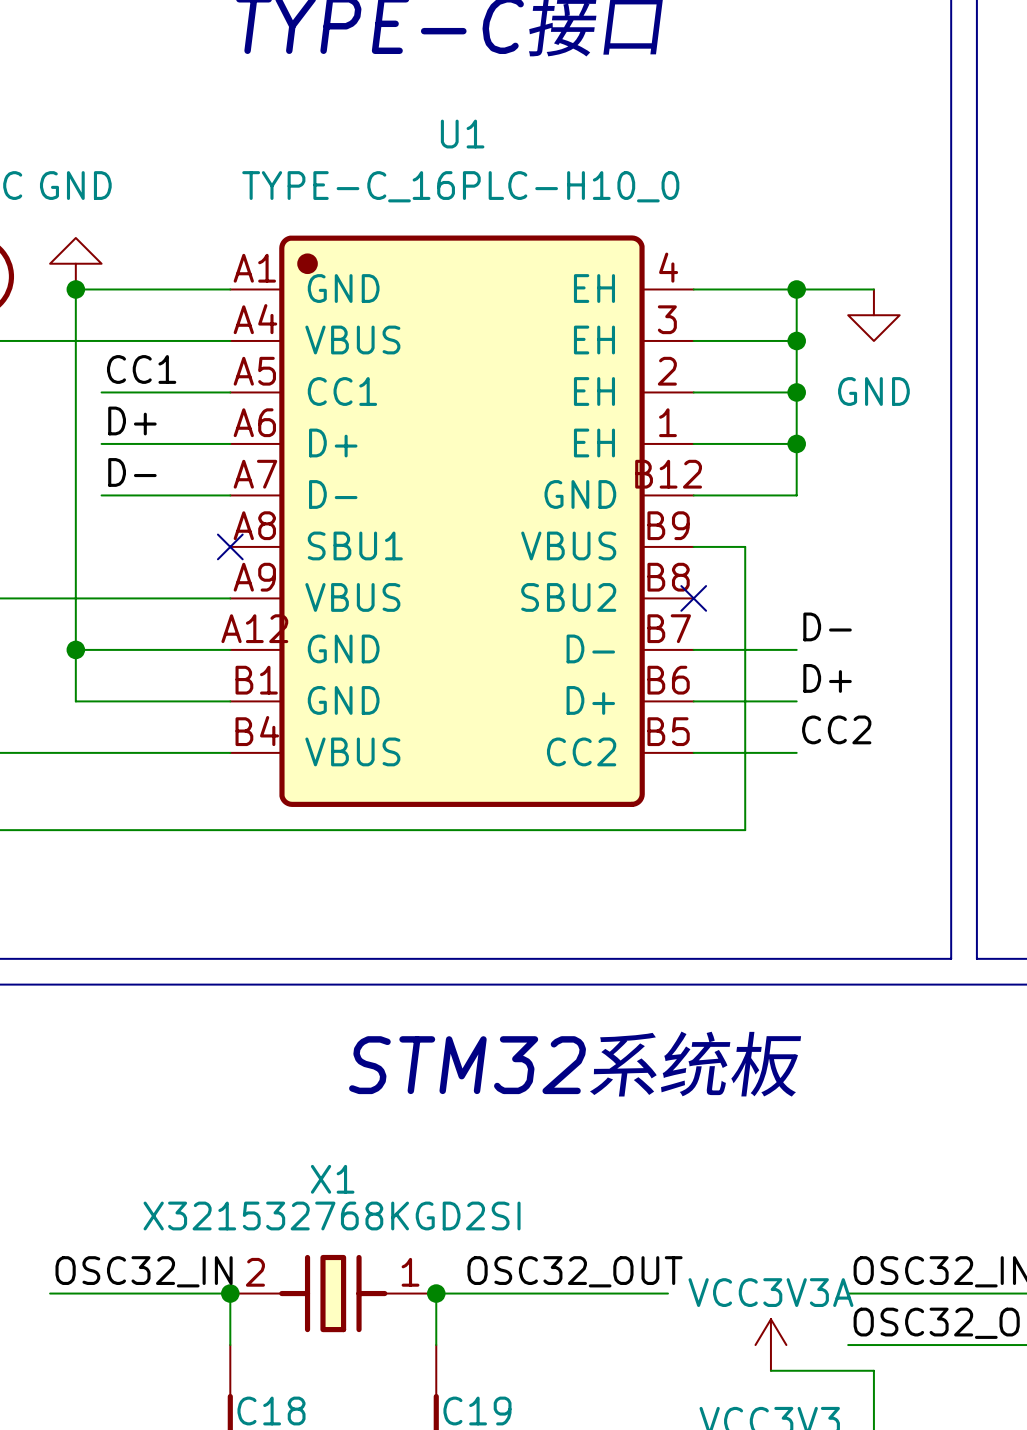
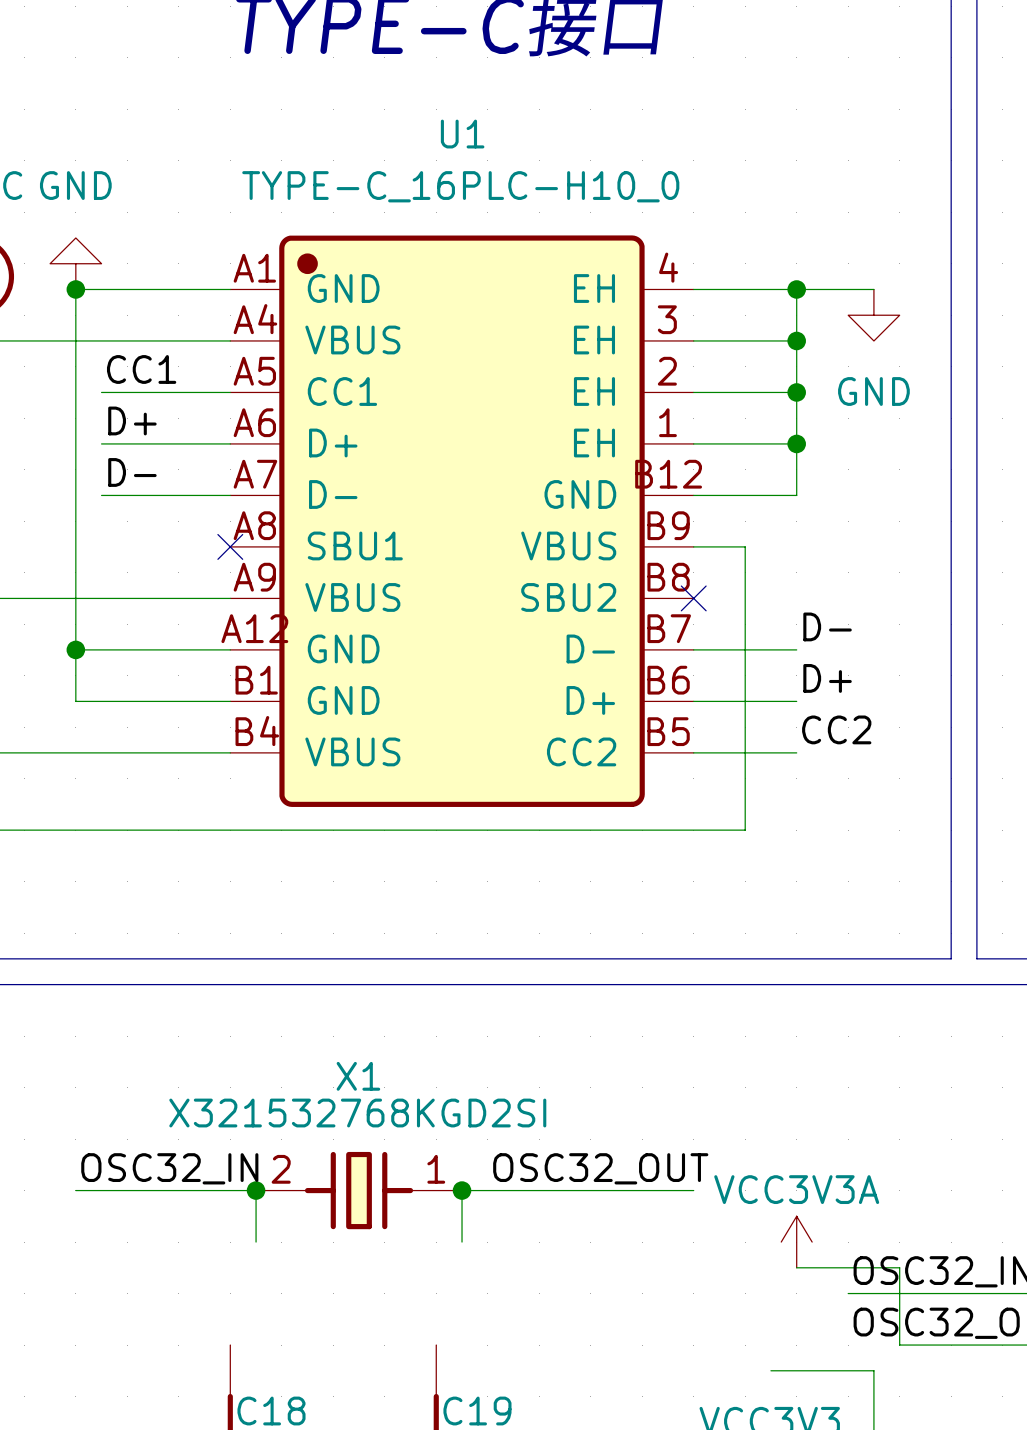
text: STM32系统板 (576, 1064) -> none
junction: none -> (256, 1190)
junction: none -> (462, 1190)
label position: OSC32_IN (144, 1271) -> OSC32_IN (169, 1168)
label position: OSC32_OUT (574, 1271) -> OSC32_OUT (600, 1168)
wire: (50, 1293) (230, 1293) (230, 1345) -> (75, 1190) (256, 1190) (256, 1242)
junction: (230, 1293) -> none
X1 position: (333, 1293) -> (359, 1190)
junction: (436, 1293) -> none
wire: (667, 1293) (436, 1293) (436, 1345) -> (693, 1190) (462, 1190) (462, 1242)
power symbol position: VCC3V3A (770, 1345) -> VCC3V3A (796, 1242)
wire: (848, 1345) (899, 1345) -> (796, 1267) (899, 1267) (899, 1345)

